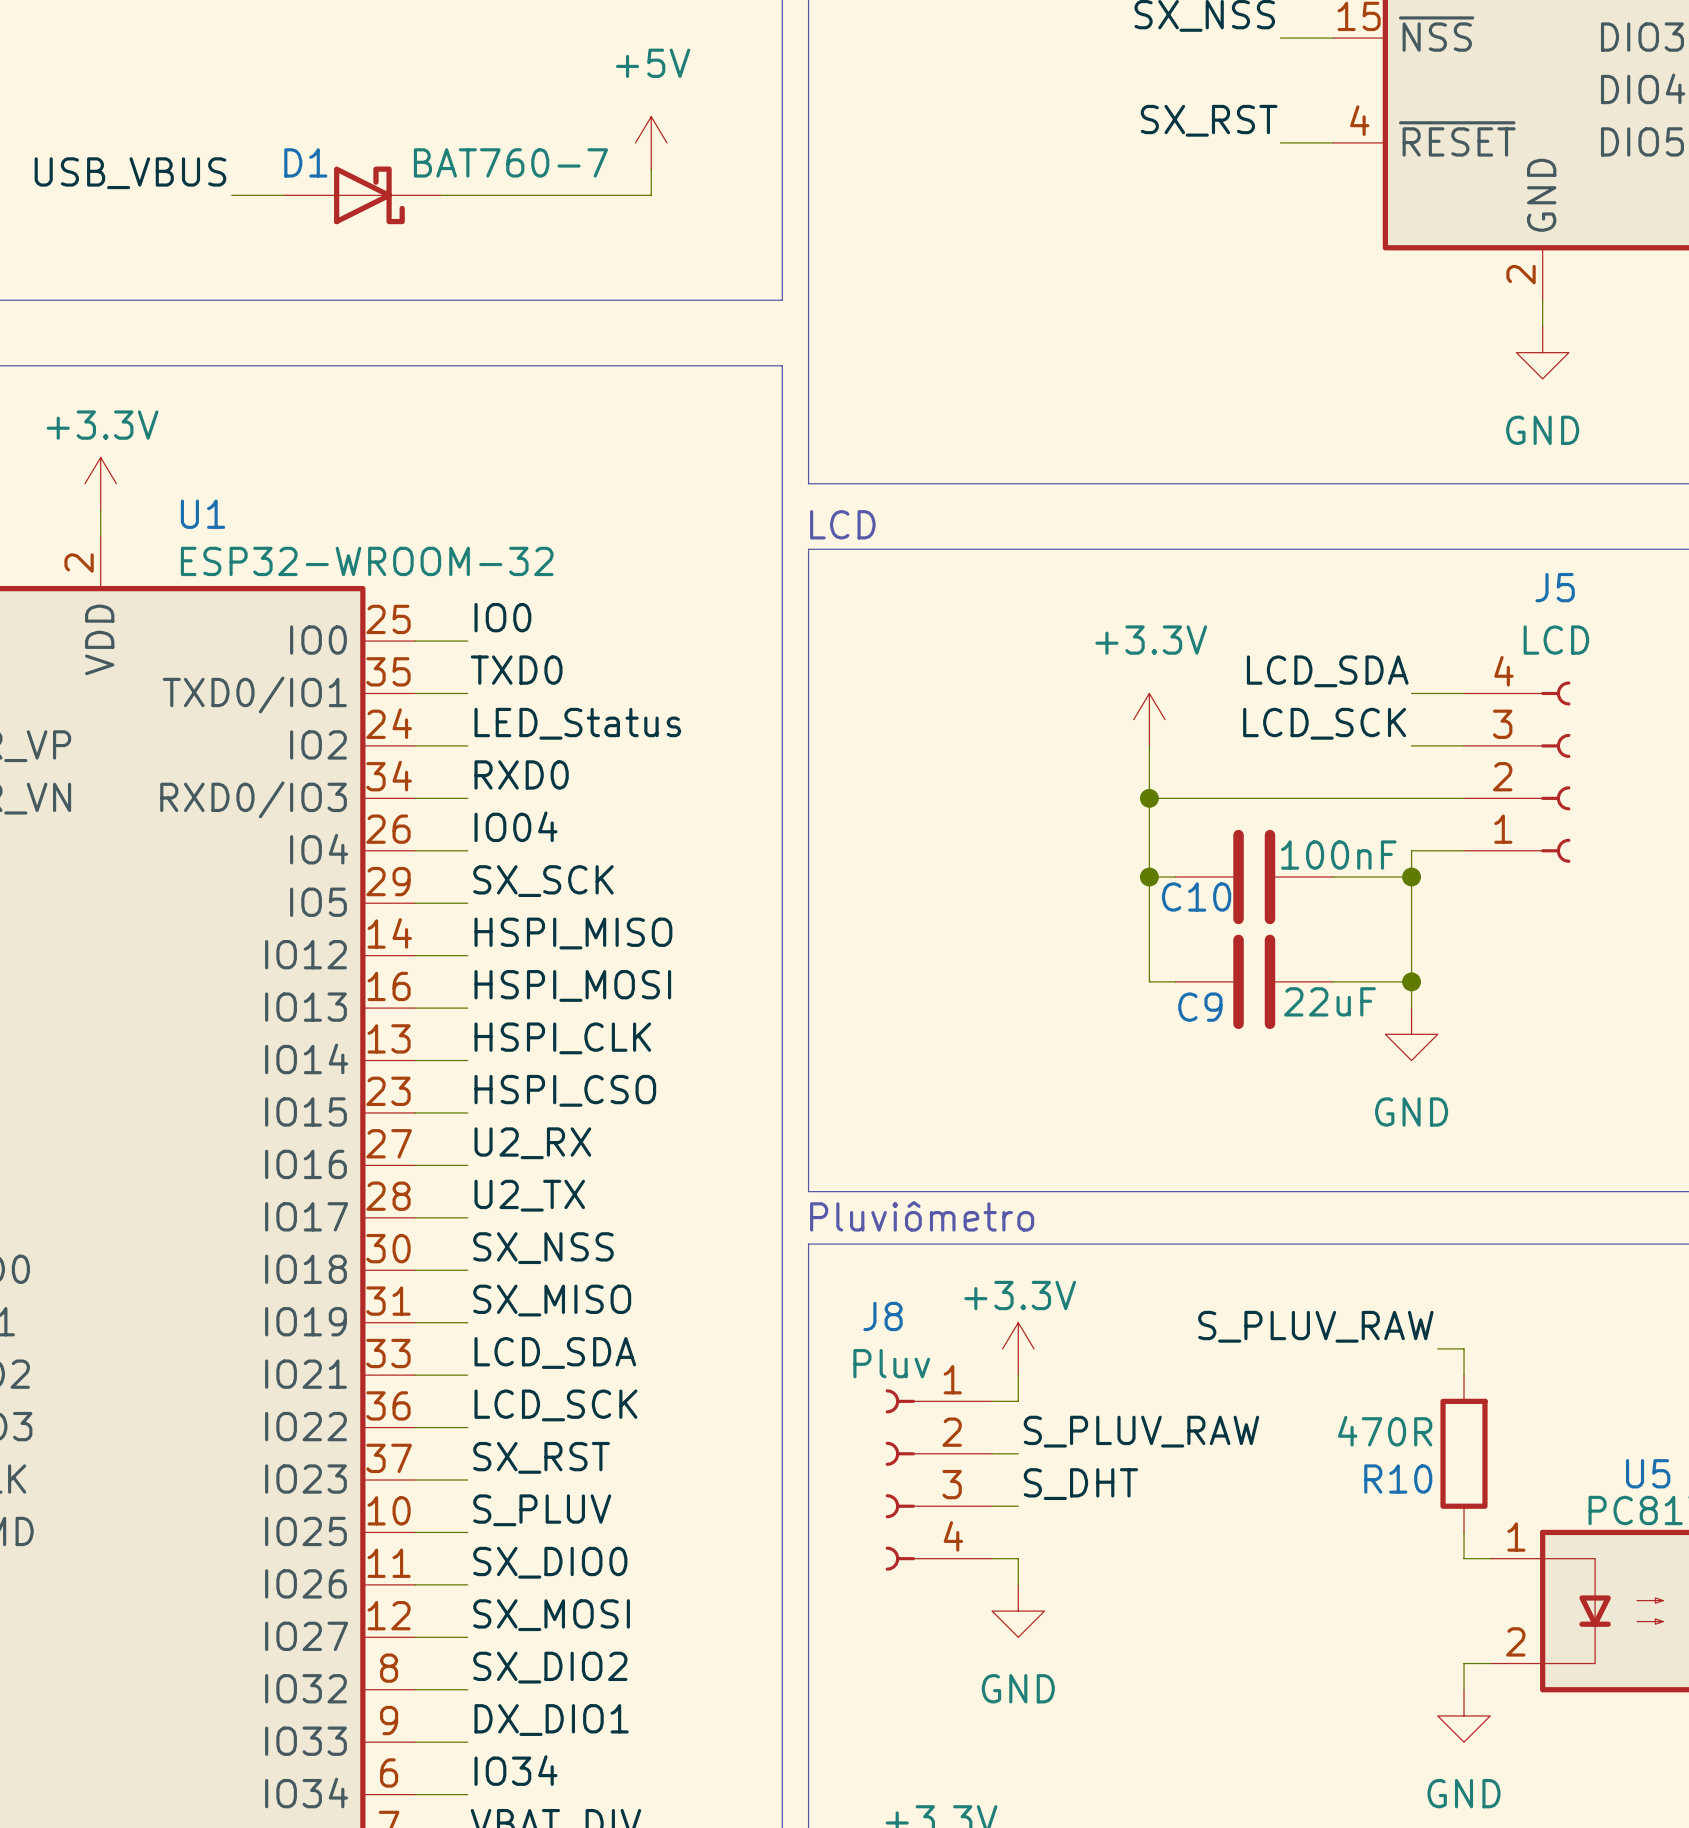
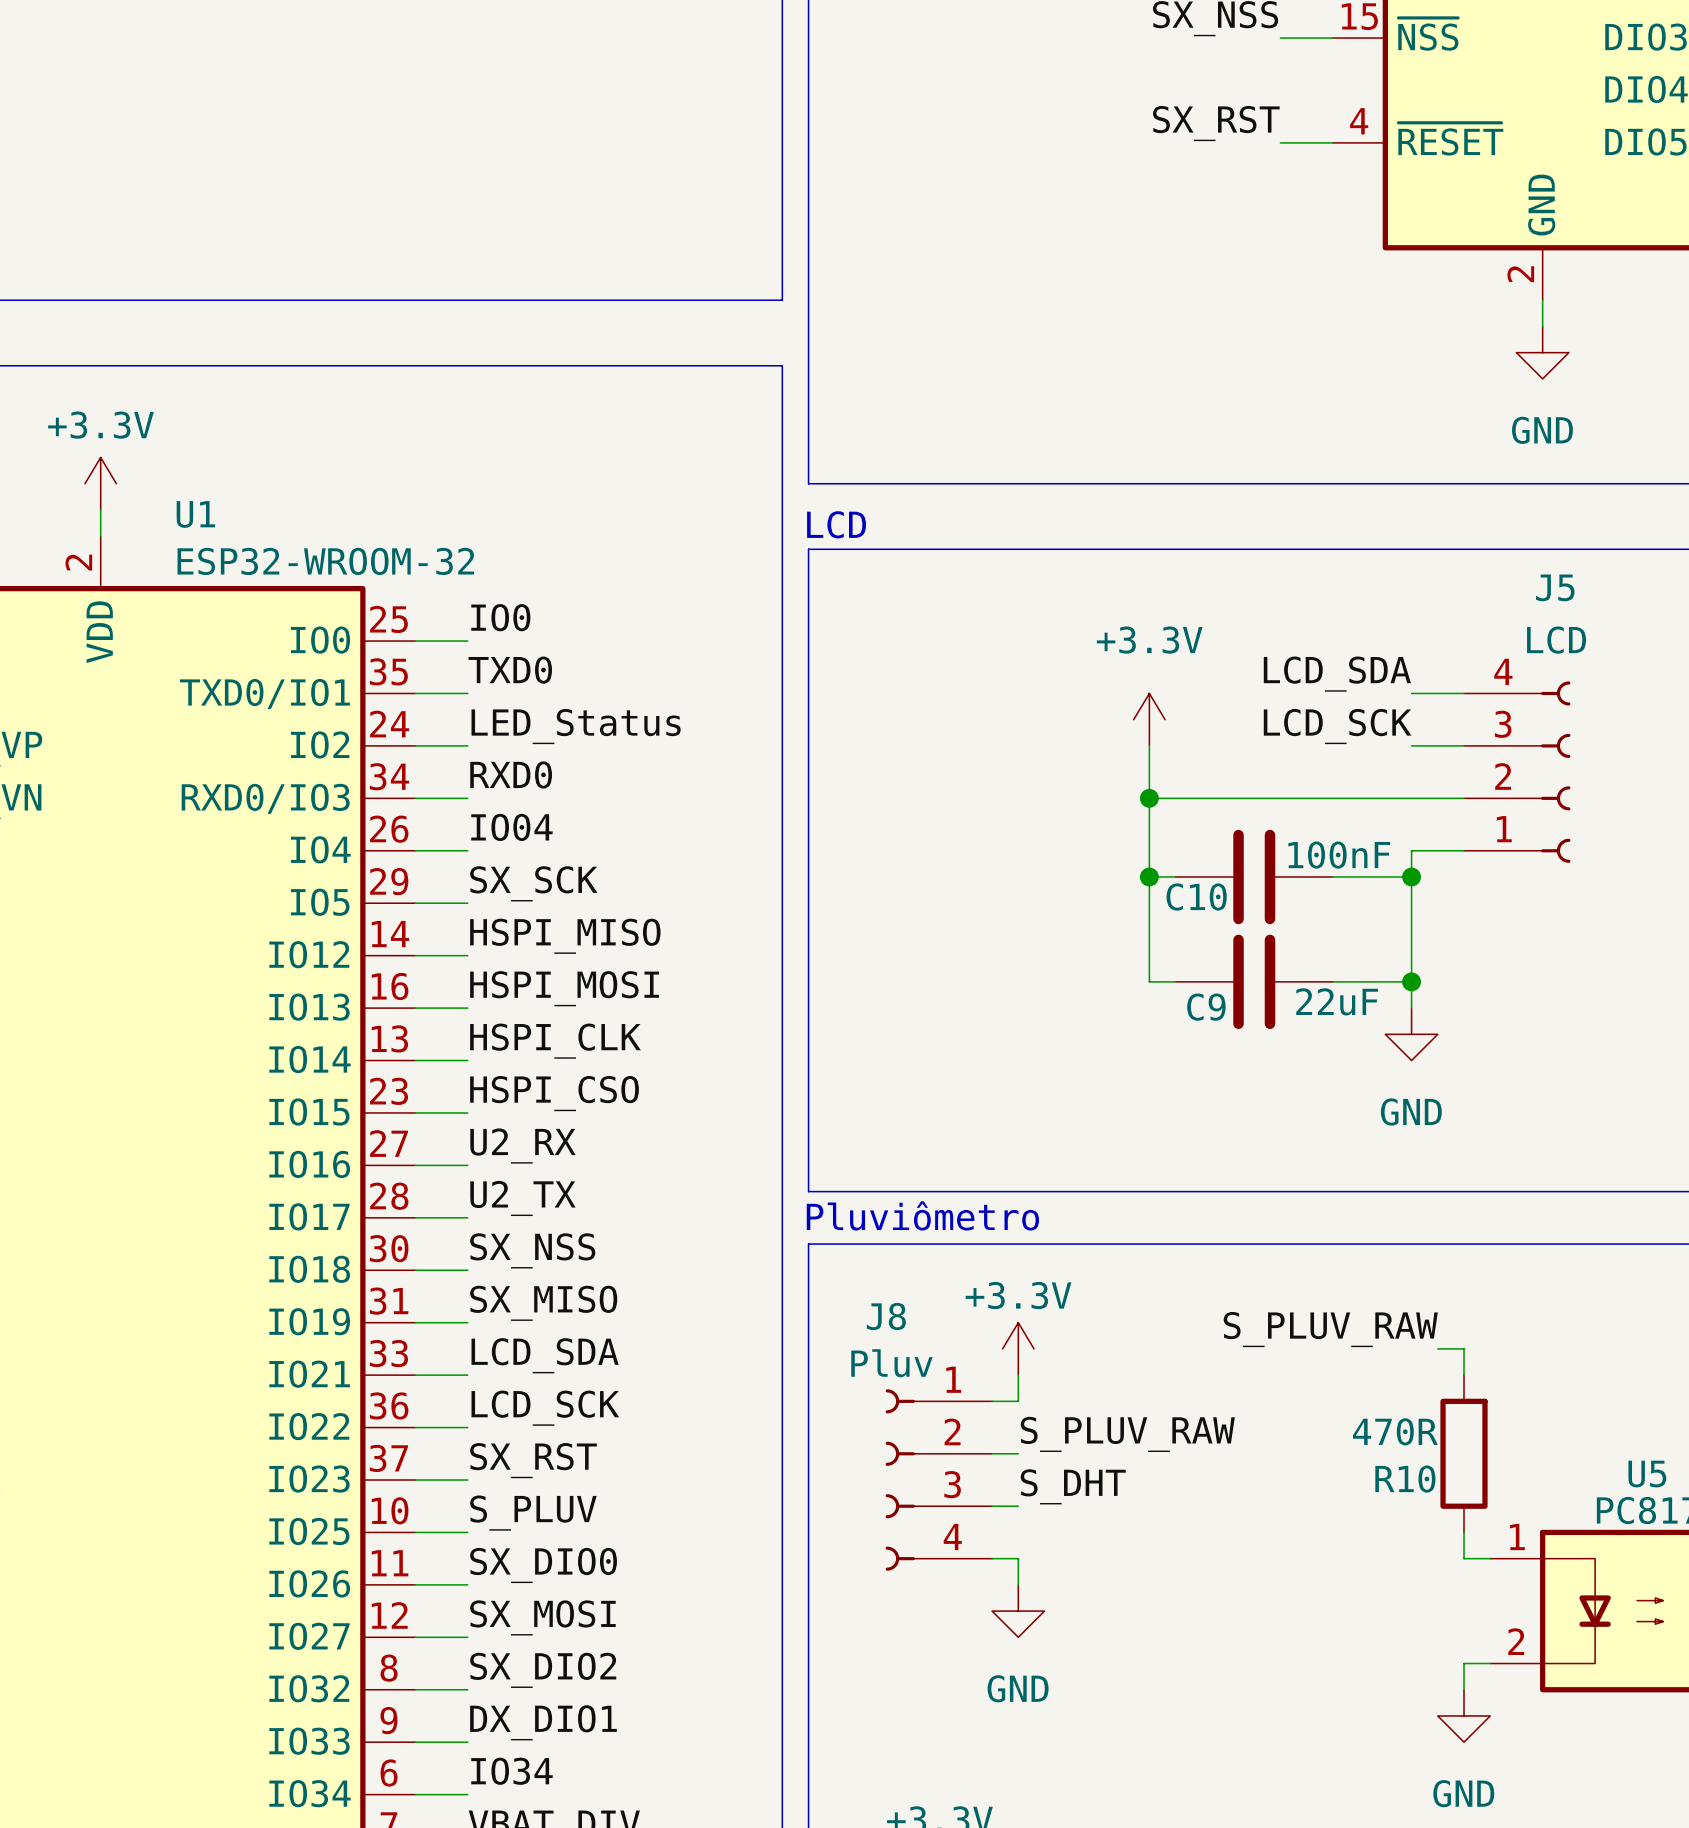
power symbol: +5V (651, 142) -> none
wire: (651, 169) (651, 195) (441, 195) -> none
label: USB_VBUS (130, 173) -> none
wire: (231, 195) (284, 195) -> none
D1: BAT760-7 (362, 195) -> none

